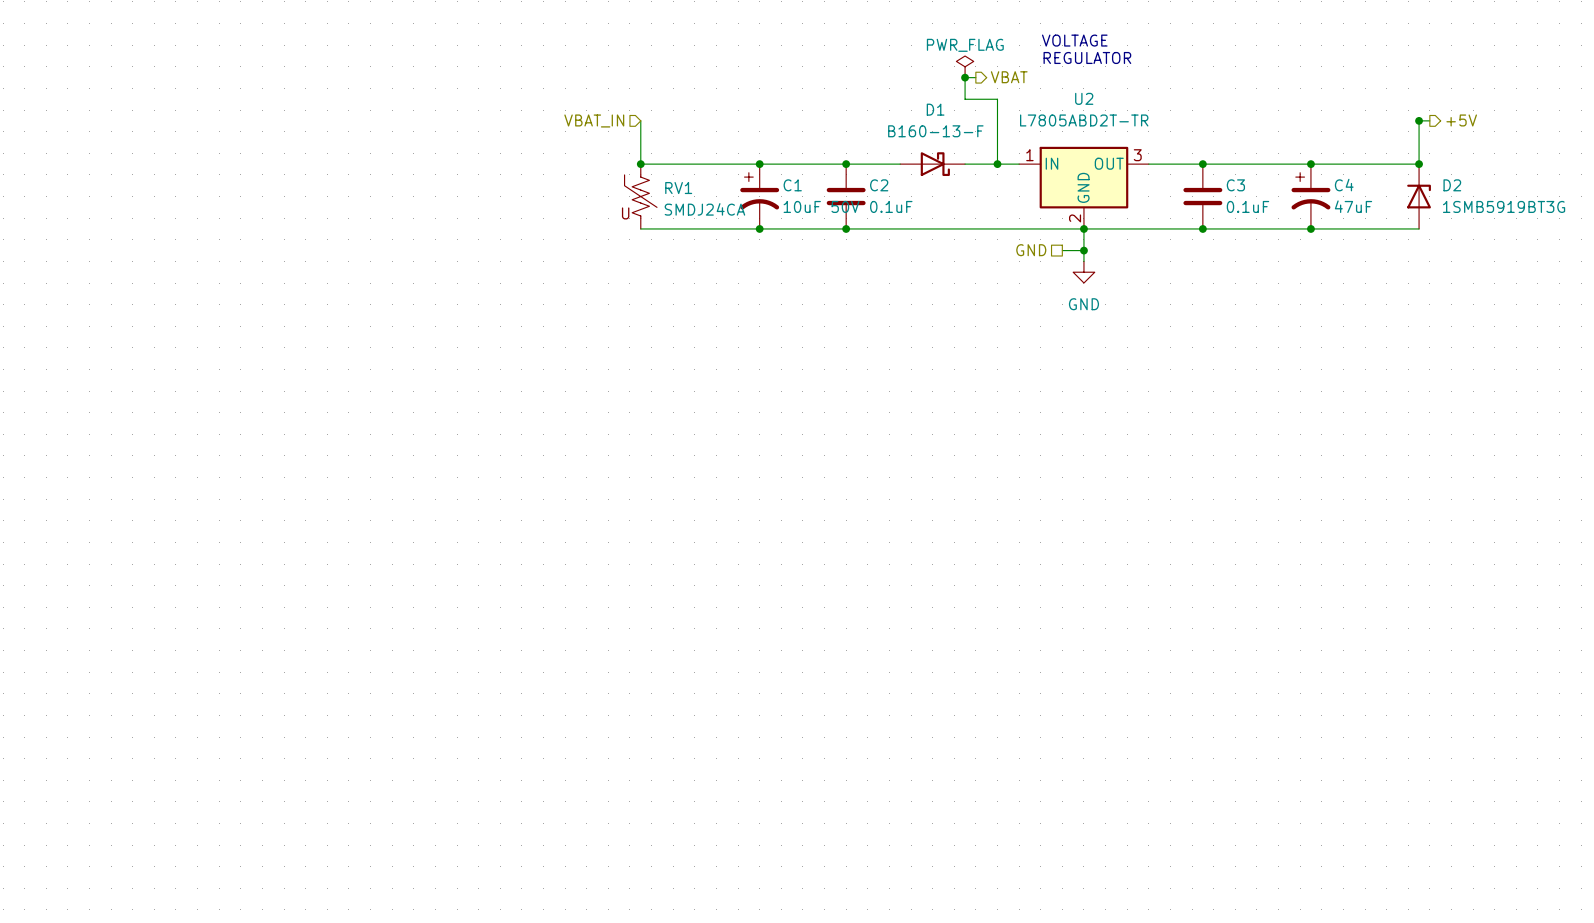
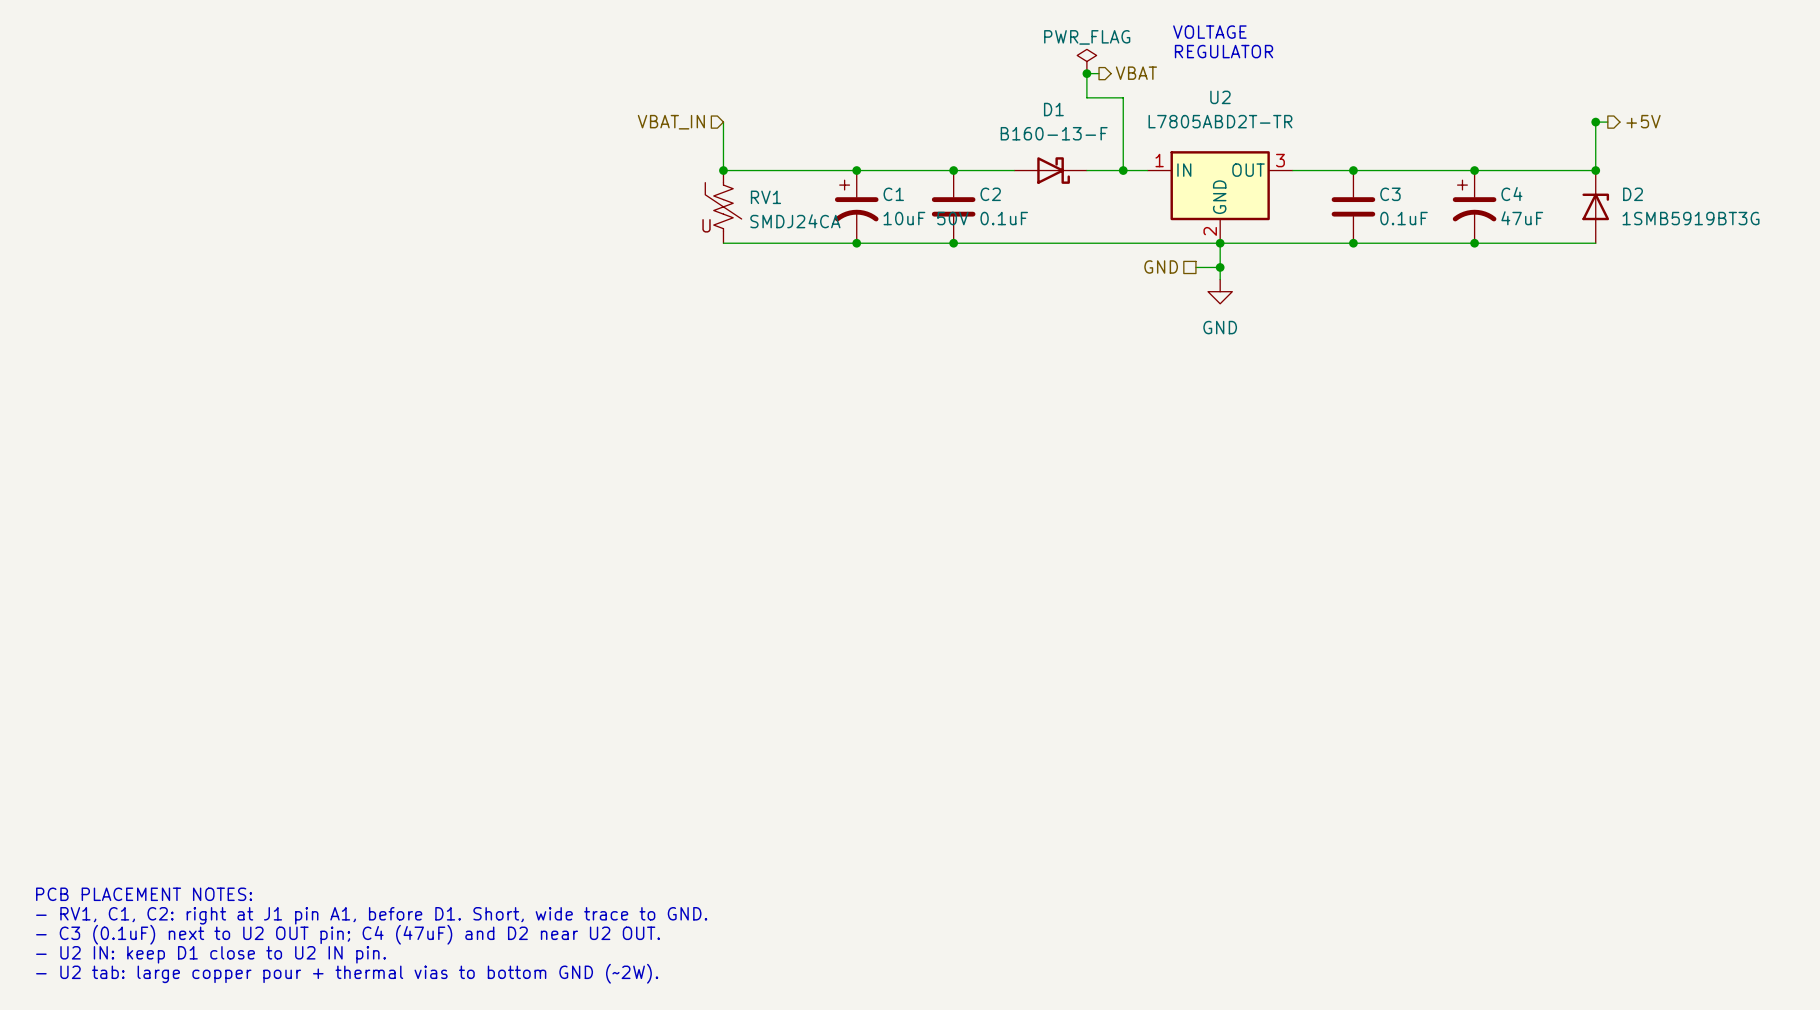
text: none -> PCB PLACEMENT NOTES: (144, 894)
text: none -> - RV1, C1, C2: right at J1 pin A1, before D1. Short, wide trace to GND. (371, 915)
text: none -> - C3 (0.1uF) next to U2 OUT pin; C4 (47uF) and D2 near U2 OUT. (348, 934)
text: none -> - U2 IN: keep D1 close to U2 IN pin. (210, 954)
text: none -> - U2 tab: large copper pour + thermal vias to bottom GND (~2W). (347, 973)

